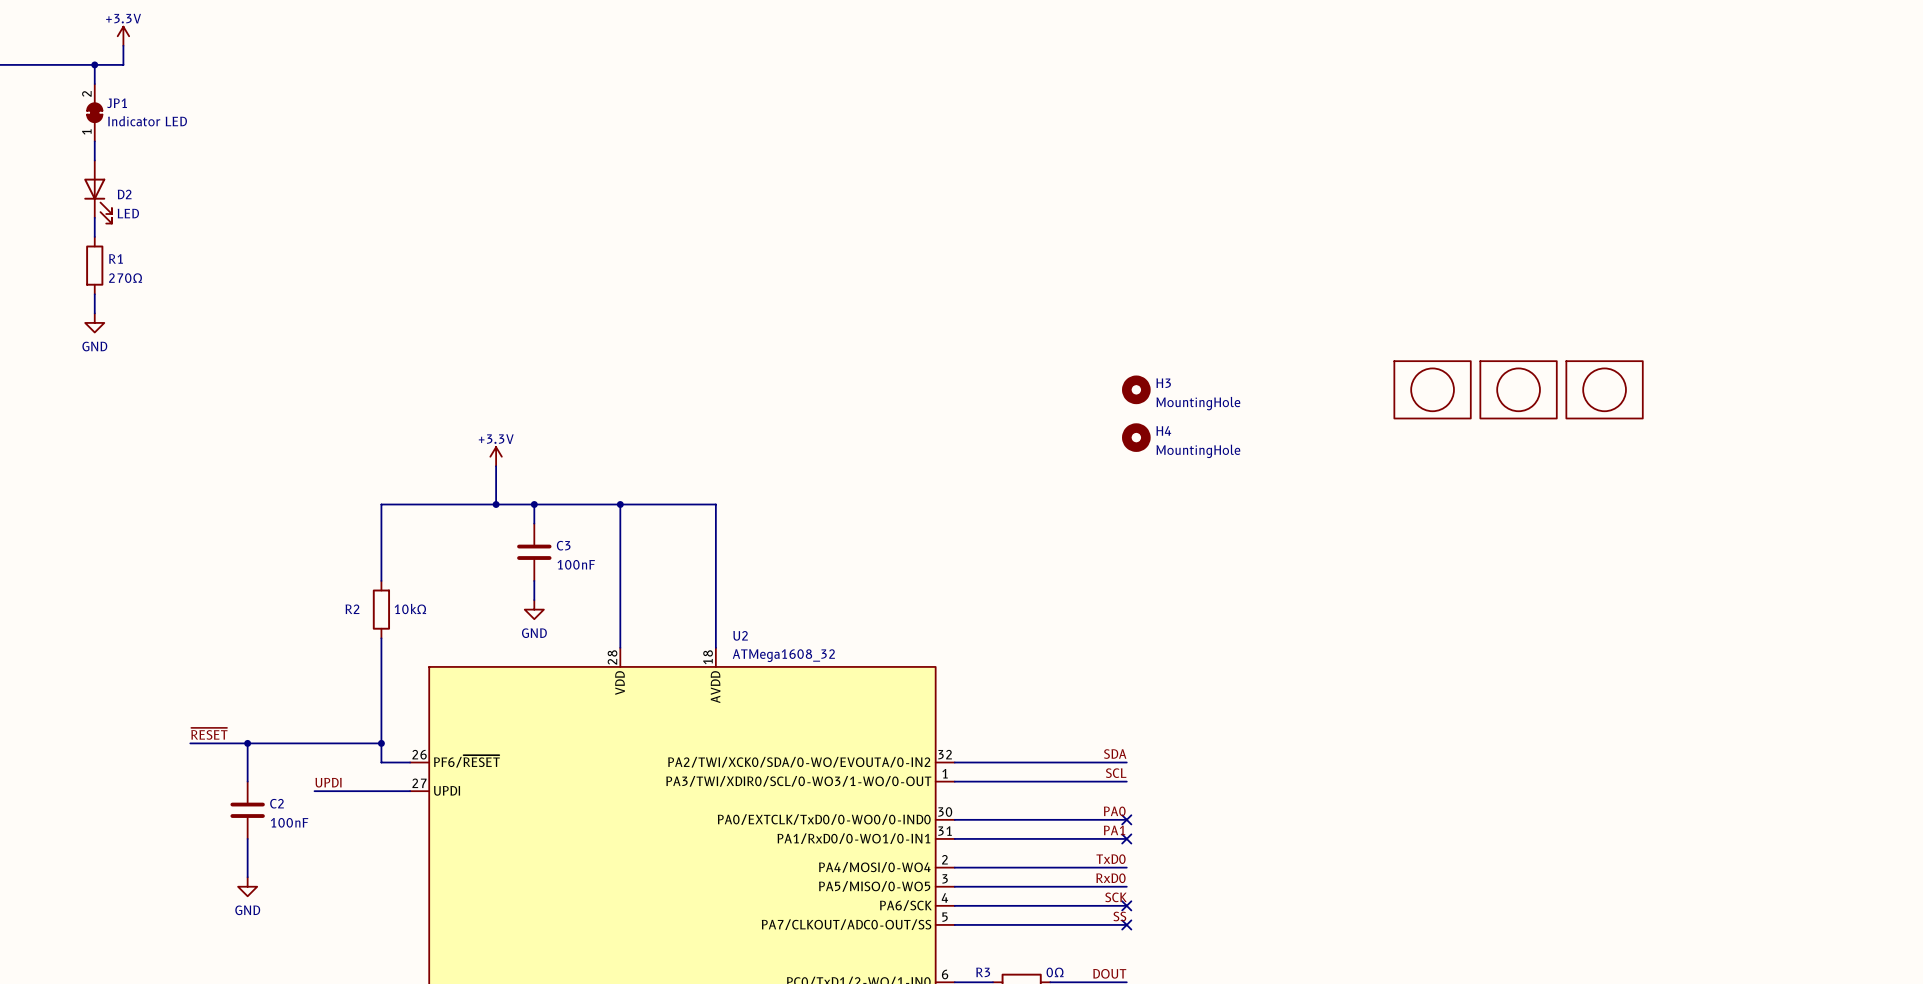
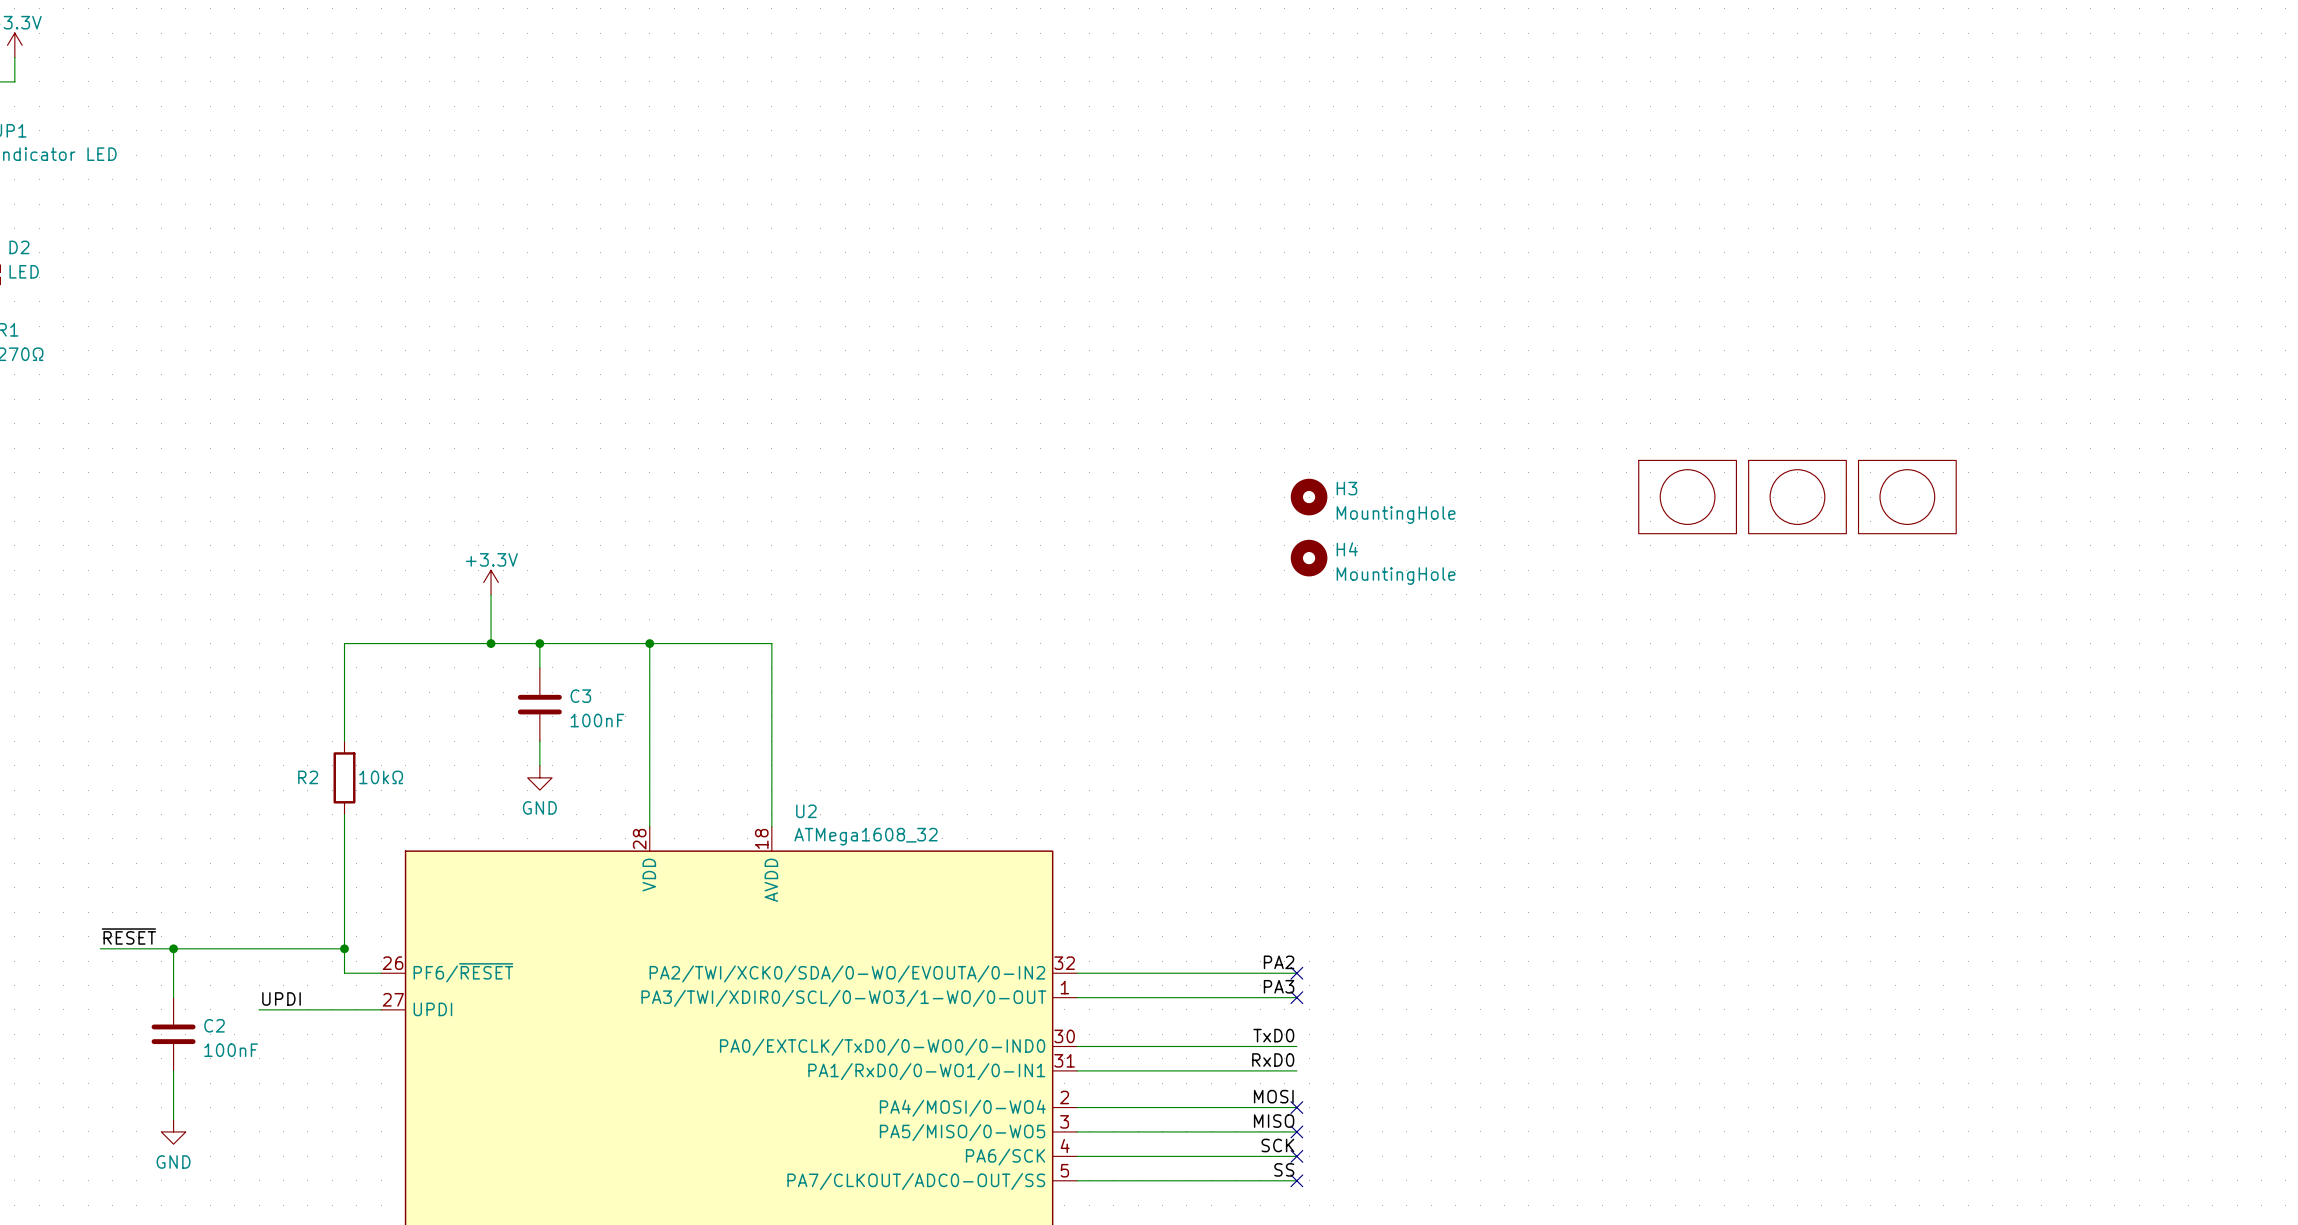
label: SDA (1115, 754) -> PA2 (1279, 962)
no-connect mark: none -> (1296, 973)
label: SCL (1116, 773) -> PA3 (1279, 986)
no-connect mark: none -> (1296, 997)
label: PA0 (1114, 811) -> TxD0 (1273, 1035)
no-connect mark: (1126, 819) -> none
label: PA1 (1114, 830) -> RxD0 (1273, 1060)
no-connect mark: (1126, 838) -> none
label: TxD0 (1111, 859) -> MOSI (1273, 1096)
no-connect mark: none -> (1296, 1107)
label: RxD0 (1110, 878) -> MISO (1274, 1121)
no-connect mark: none -> (1296, 1131)

